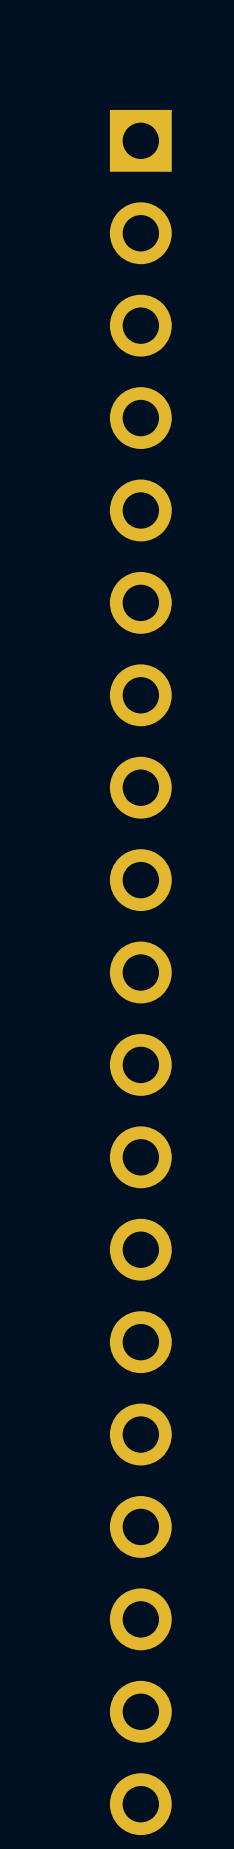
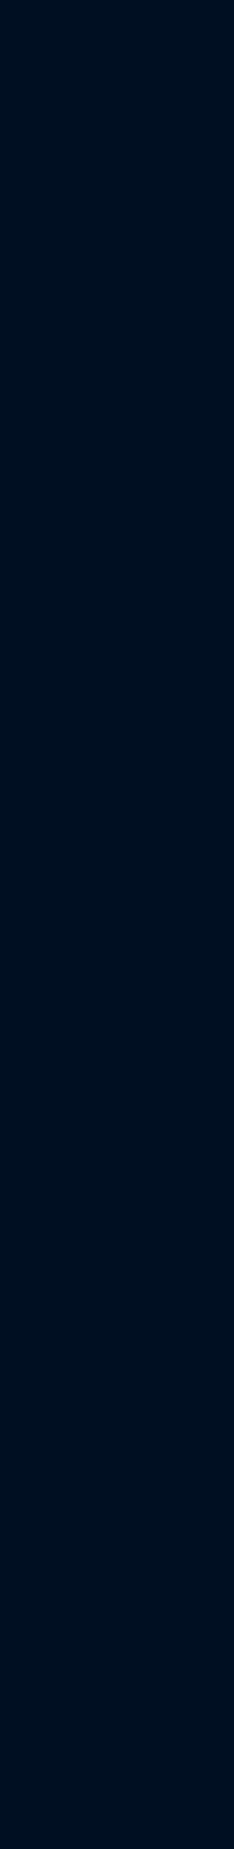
part: (140, 972) -> none

